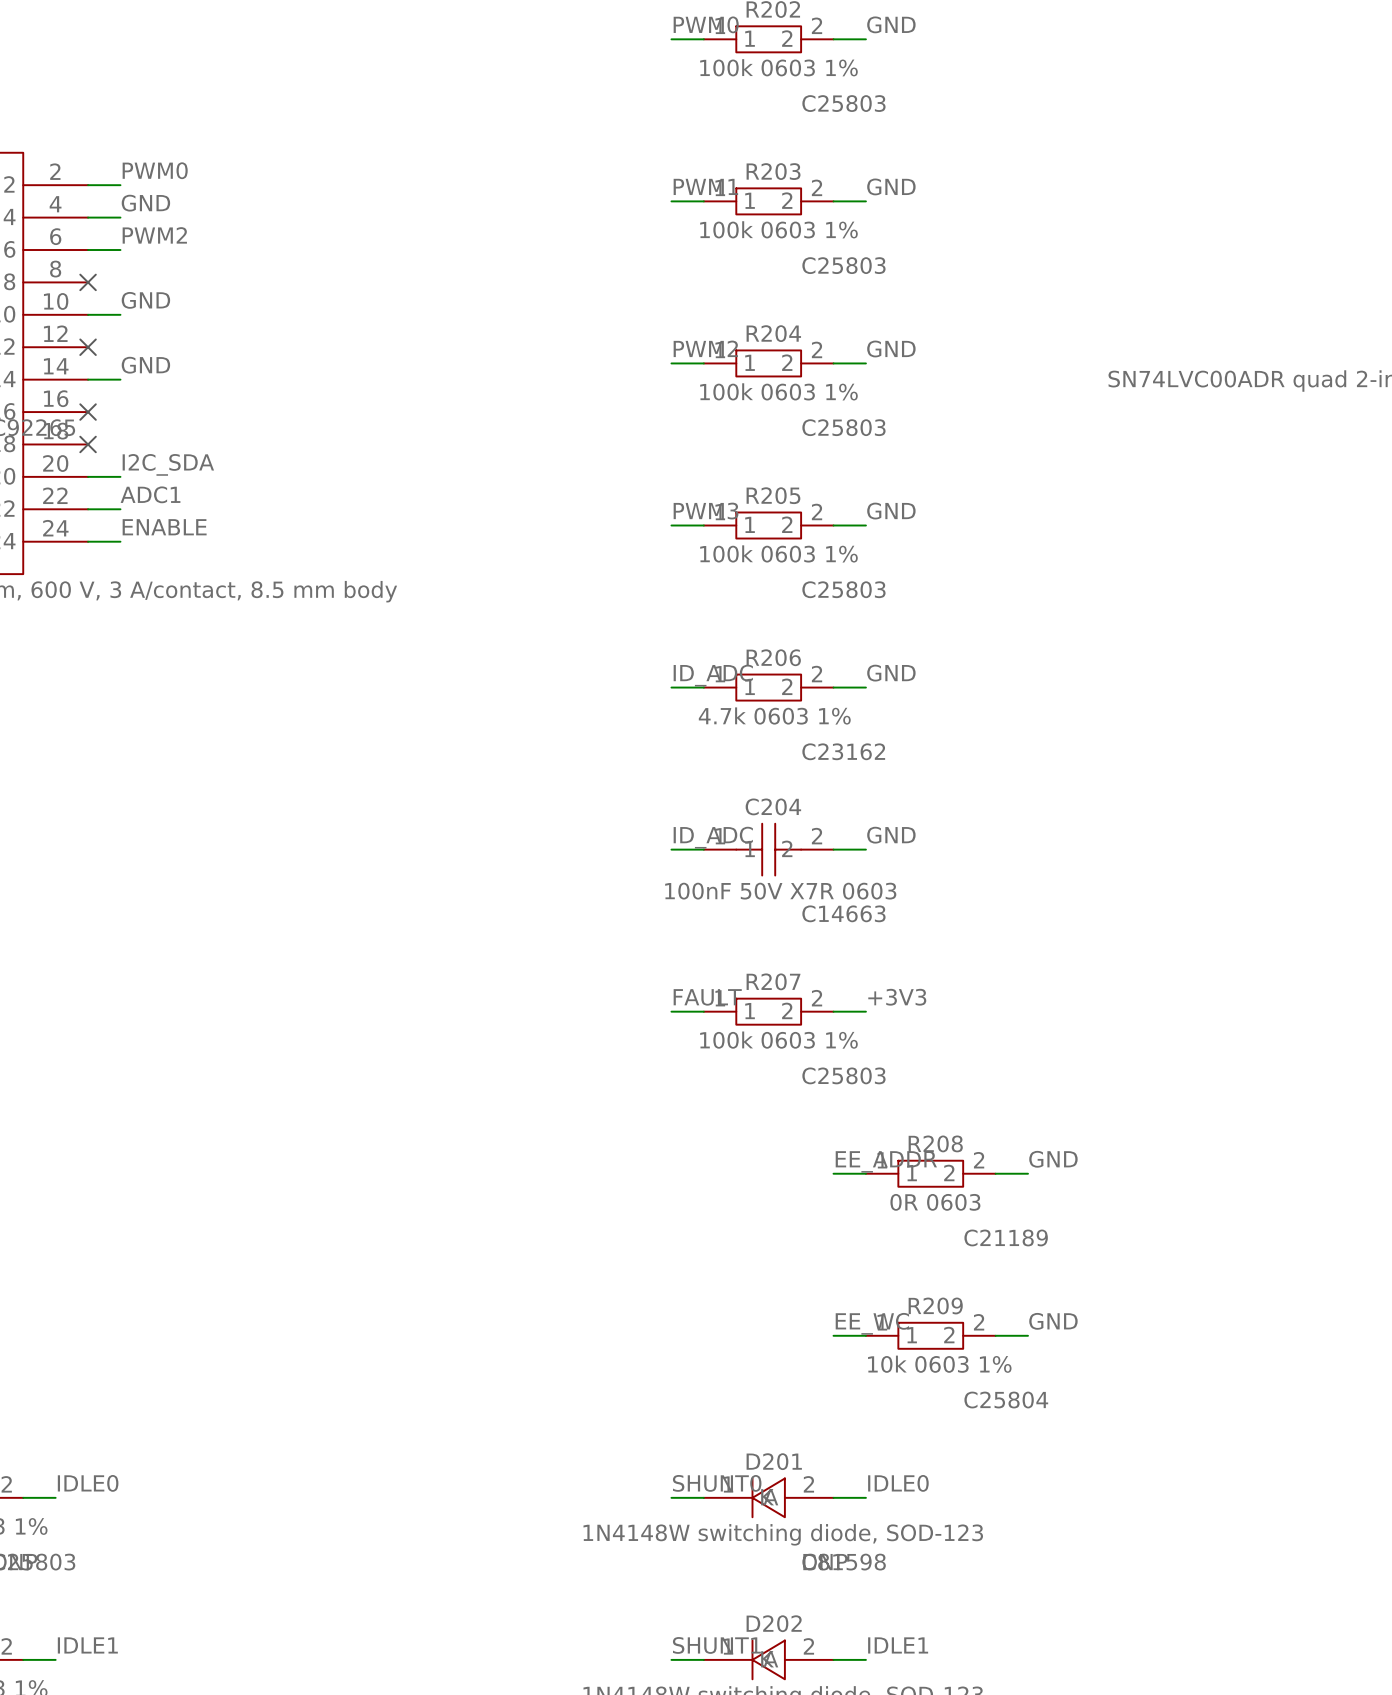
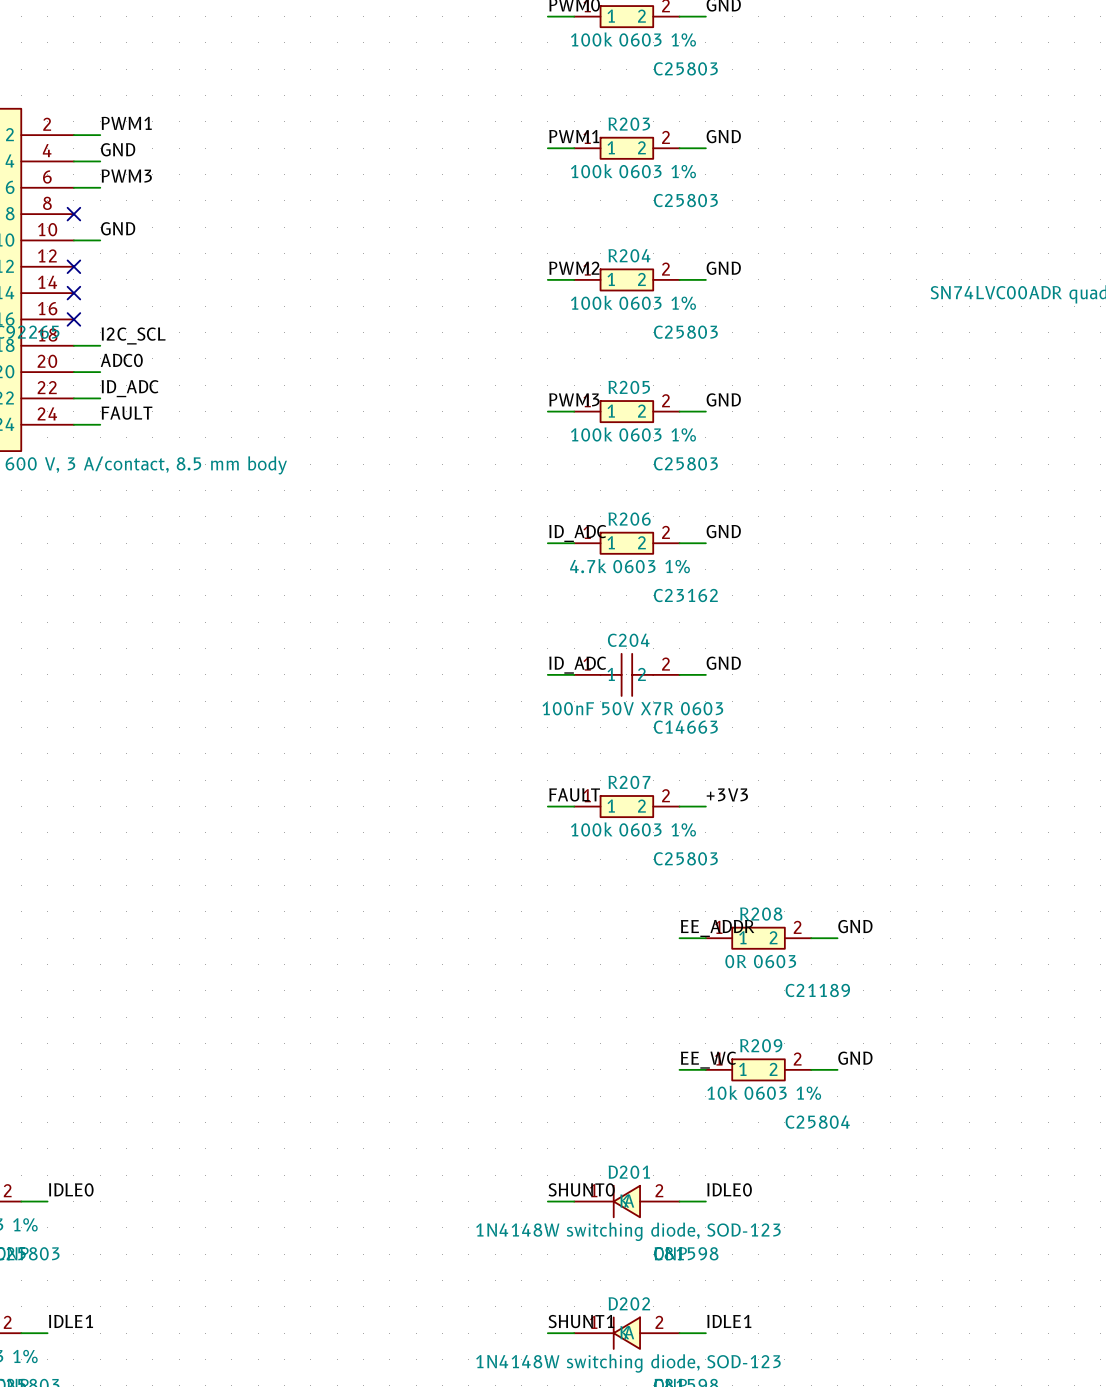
label: PWM0 (155, 170) -> PWM1 (126, 123)
label: PWM2 (154, 235) -> PWM3 (126, 176)
label: GND (145, 365) -> none
wire: (88, 379) (120, 379) -> (73, 345) (100, 345)
label: none -> I2C_SCL (133, 335)
no-connect mark position: (88, 444) -> (73, 293)
label: I2C_SDA (168, 464) -> ADC0 (121, 360)
label: ADC1 (150, 494) -> ID_ADC (130, 388)
label: ENABLE (164, 527) -> FAULT (126, 413)

